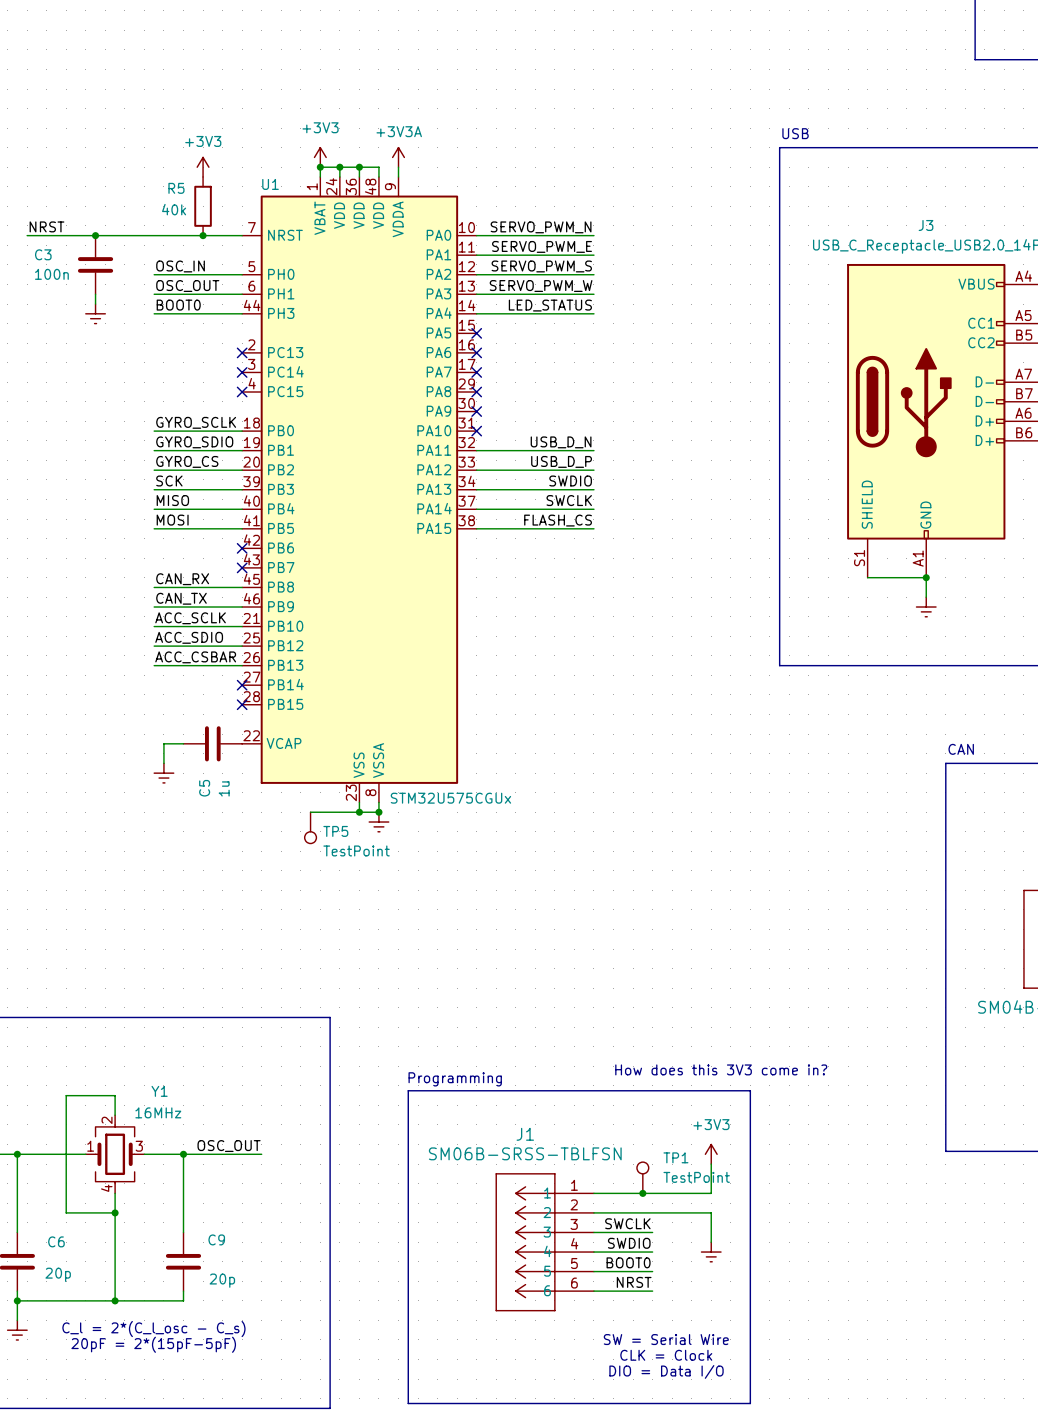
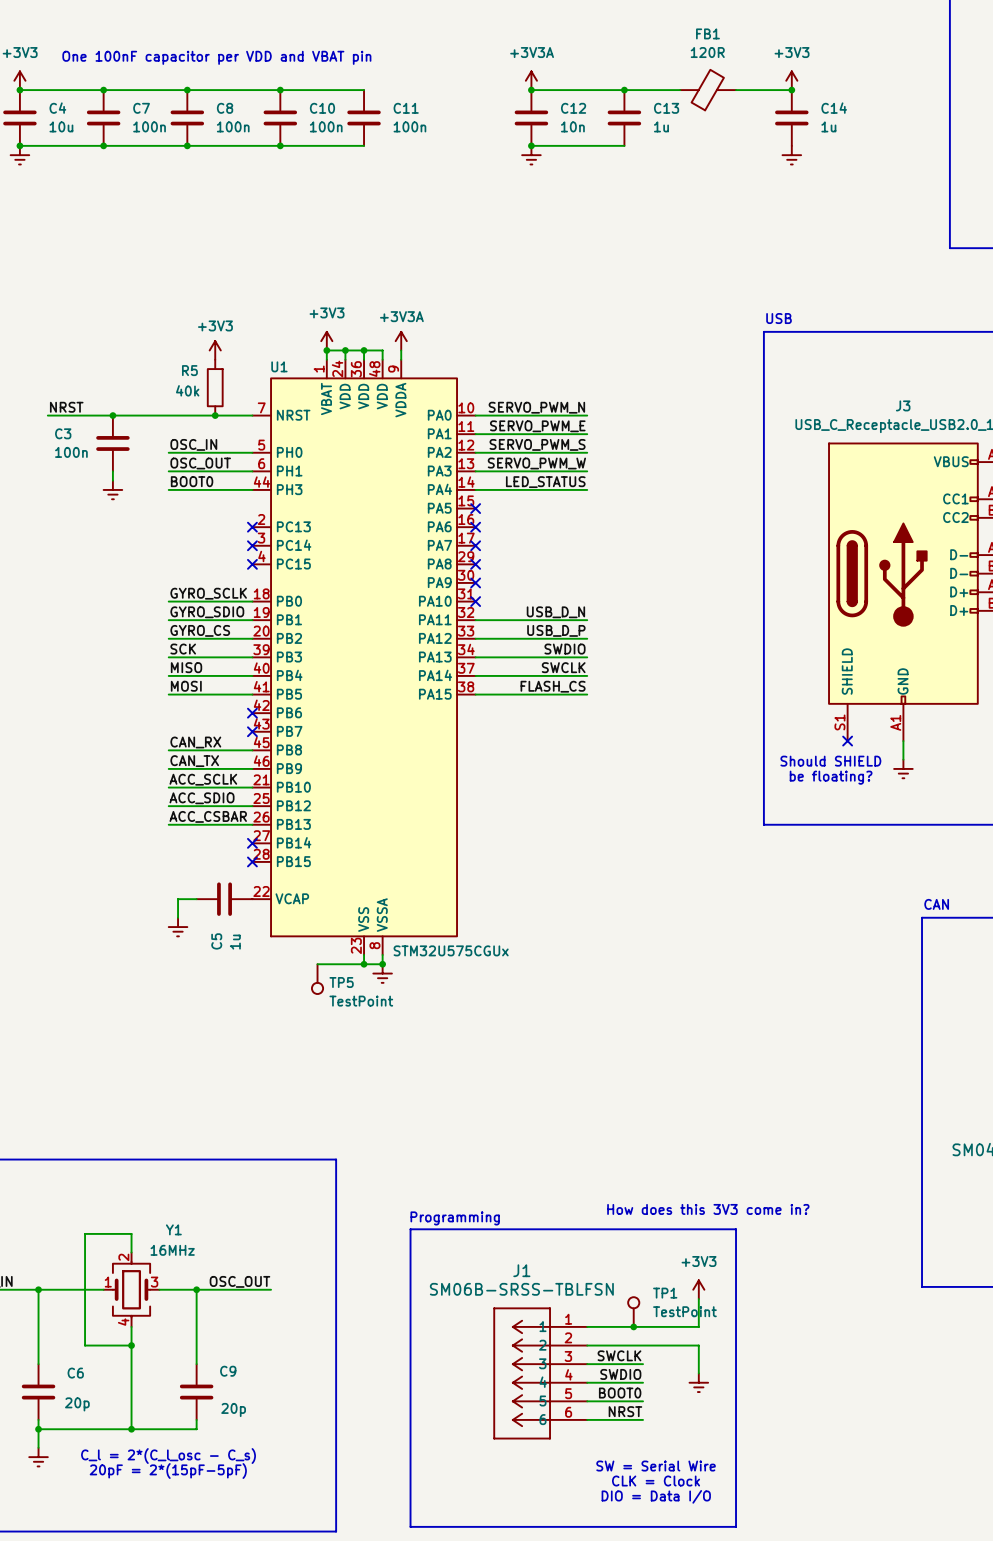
wire: (867, 577) (926, 577) -> none
no-connect mark: none -> (847, 741)
junction: (926, 577) -> none
text: none -> Should SHIELD (830, 761)
text: none -> be floating? (831, 777)

